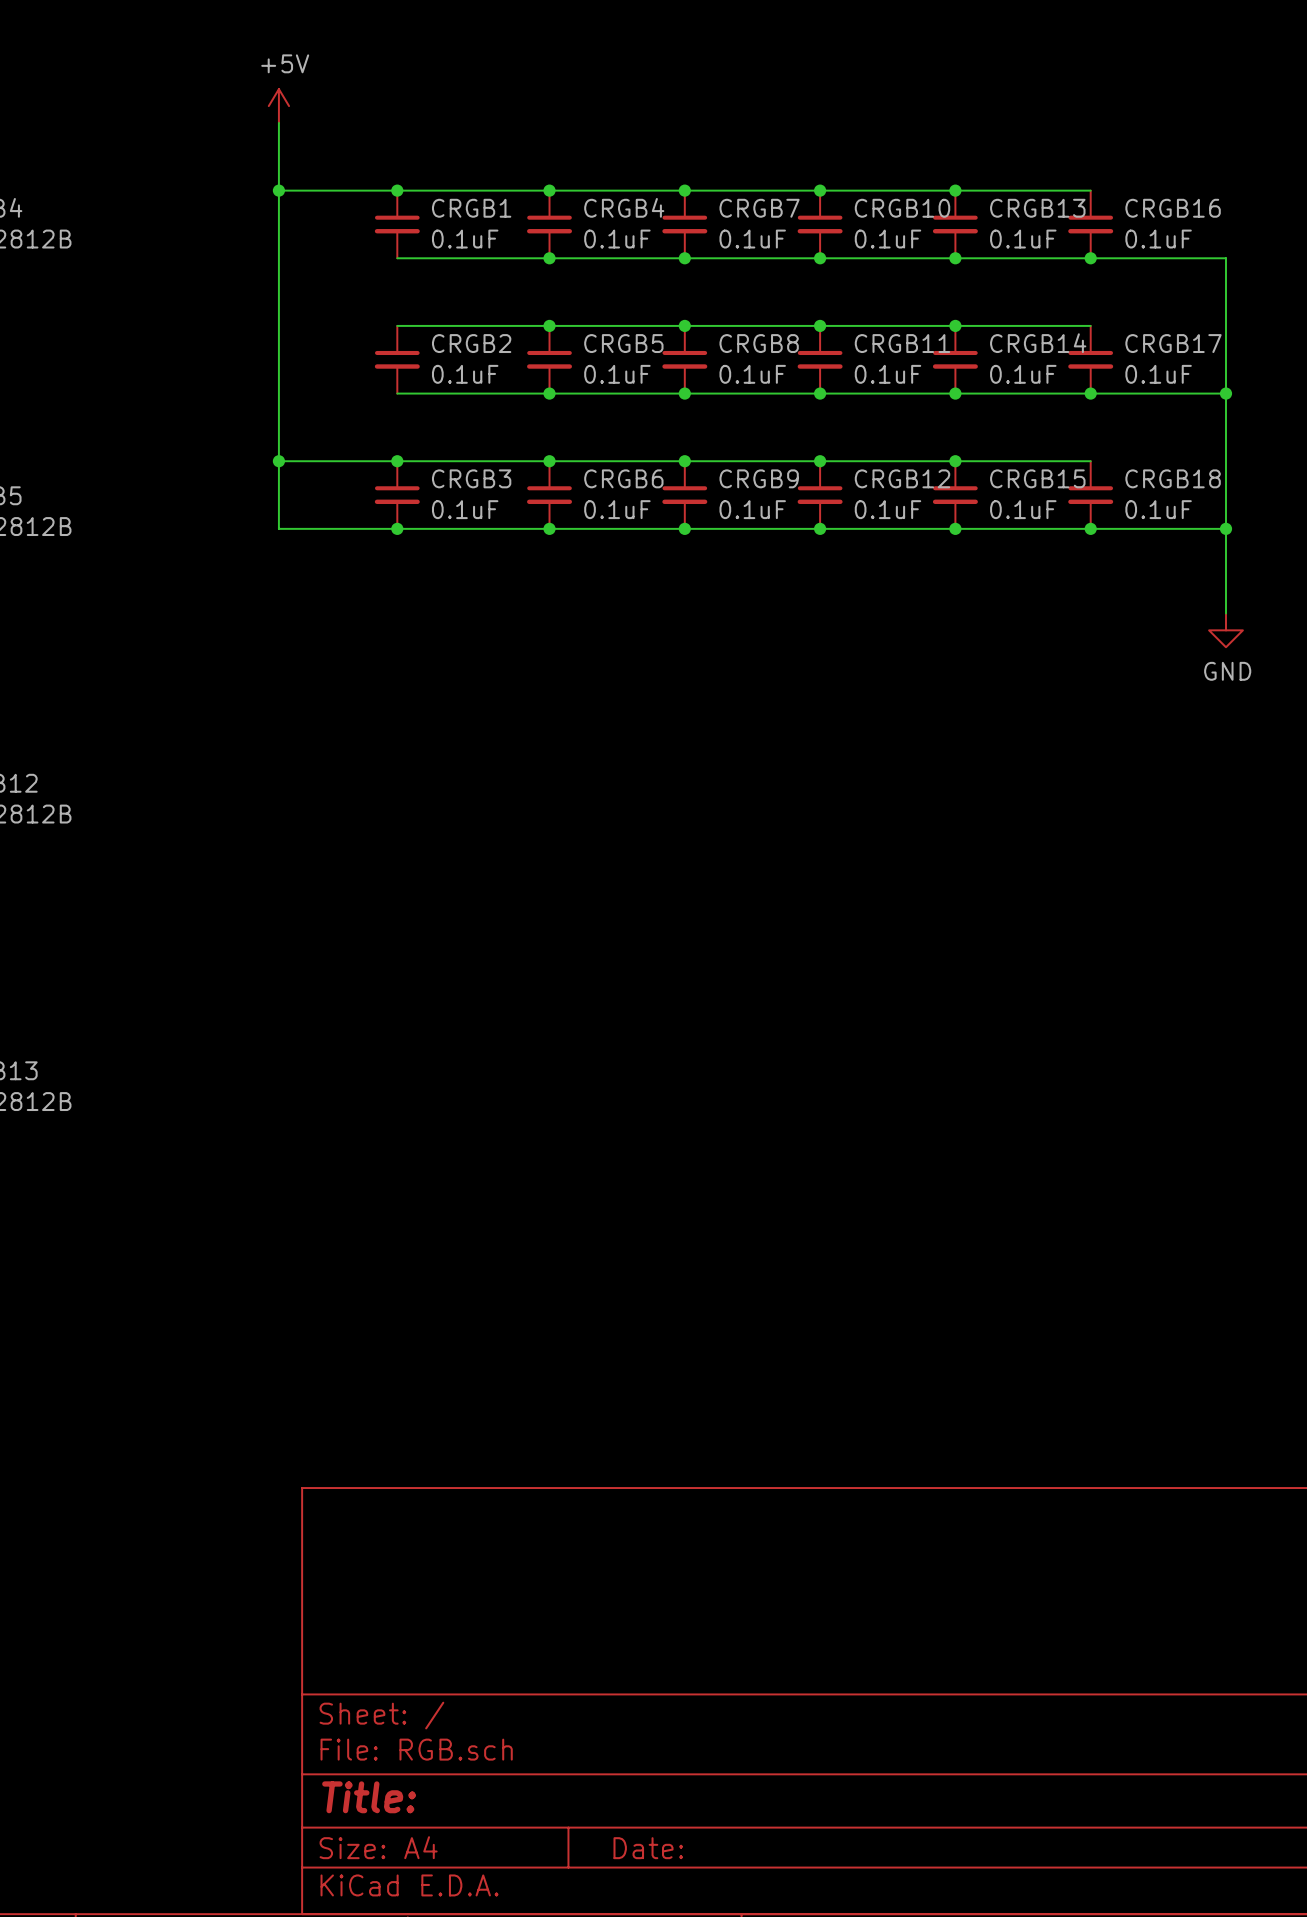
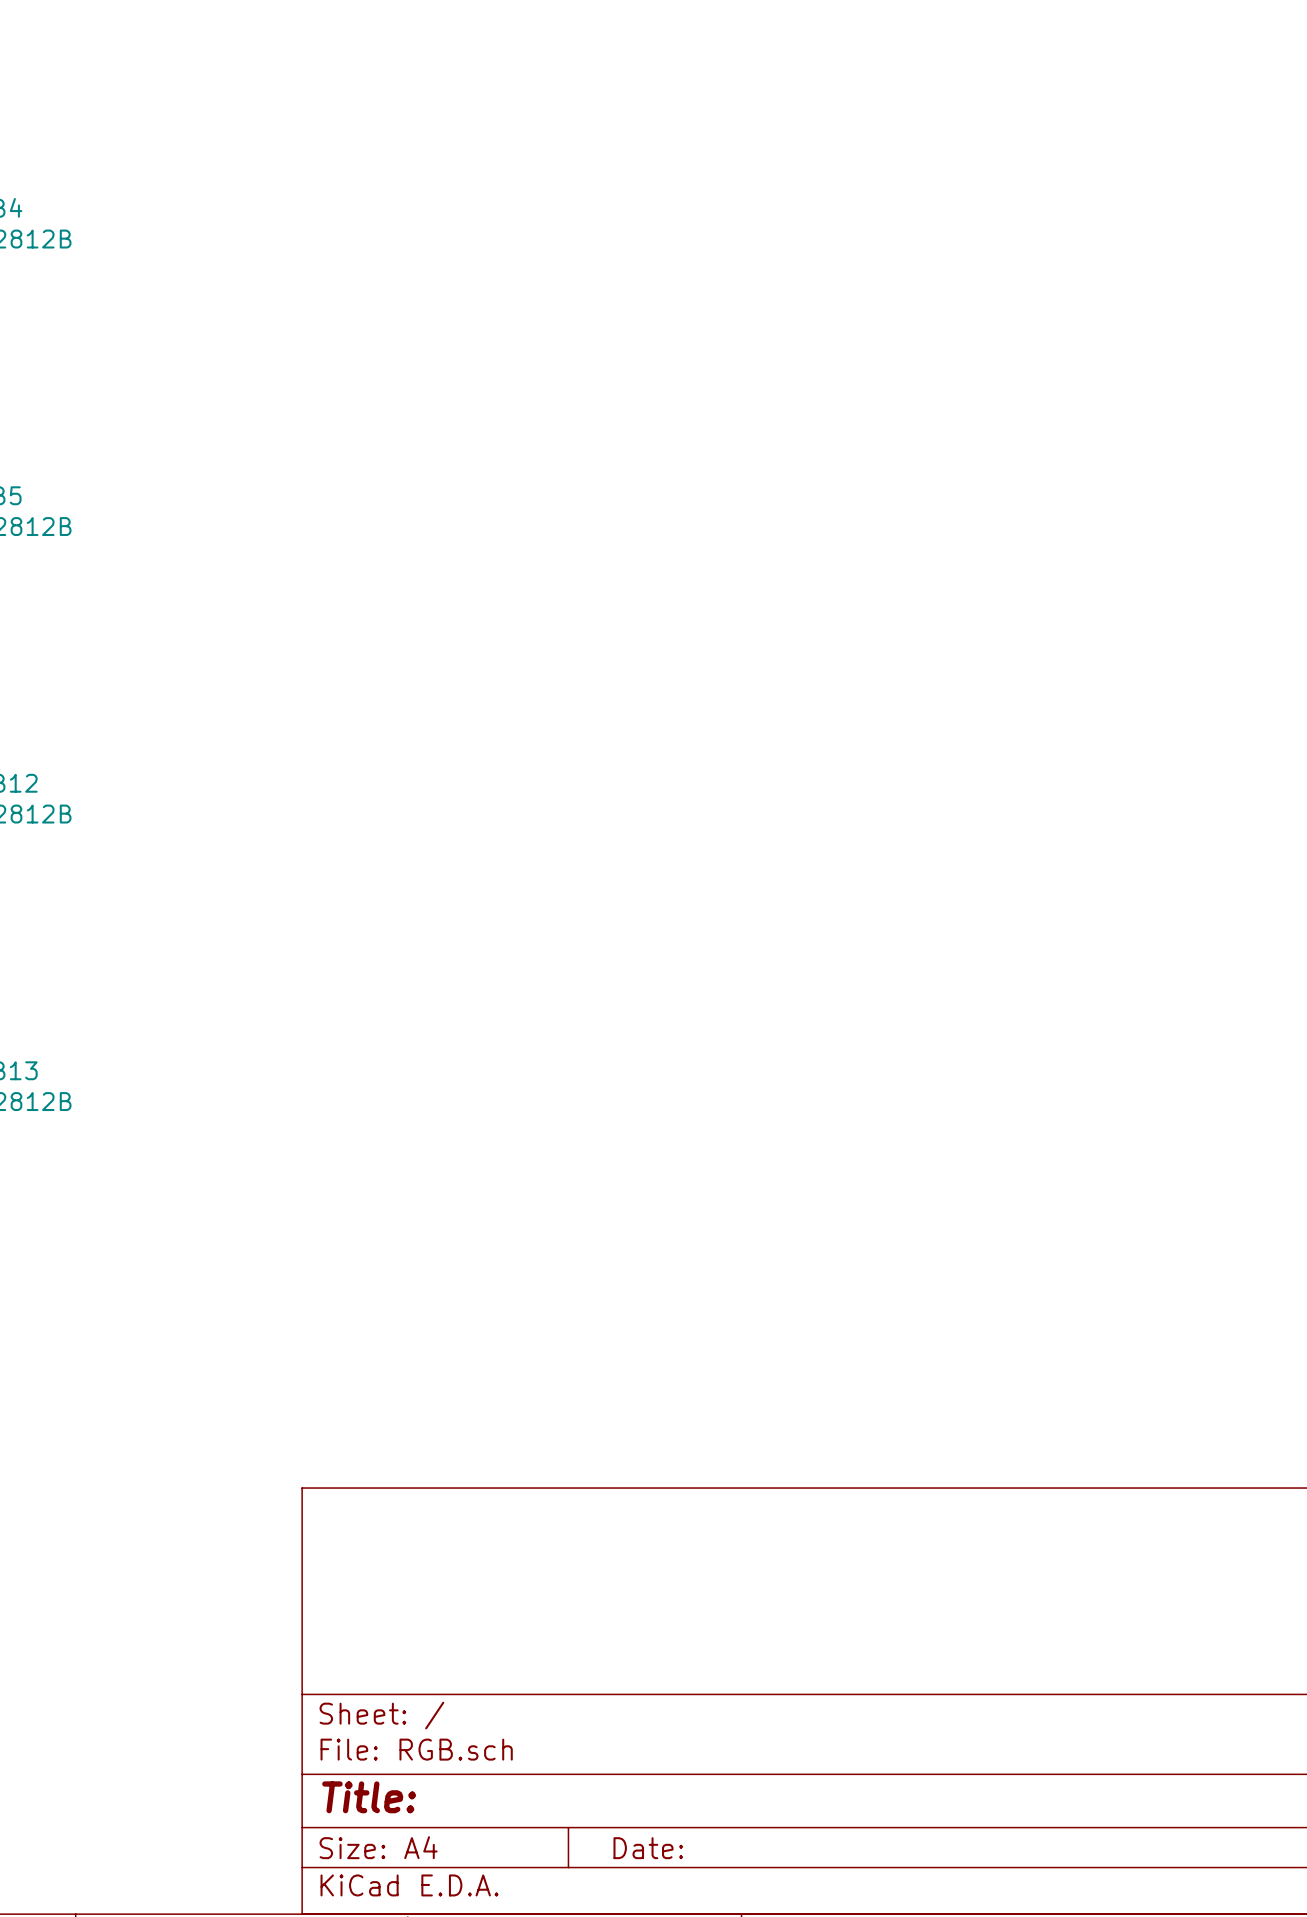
power symbol: +5V (278, 106) -> none
wire: (278, 122) (278, 528) (1226, 528) -> none
wire: (278, 190) (1090, 190) -> none
junction: (278, 190) -> none
junction: (397, 190) -> none
junction: (549, 190) -> none
junction: (684, 190) -> none
junction: (820, 190) -> none
junction: (955, 190) -> none
CRGB1: 0.1uF (397, 224) -> none
CRGB4: 0.1uF (549, 224) -> none
CRGB7: 0.1uF (684, 224) -> none
CRGB10: 0.1uF (820, 224) -> none
CRGB13: 0.1uF (955, 224) -> none
CRGB16: 0.1uF (1090, 224) -> none
wire: (397, 258) (1226, 258) (1226, 613) -> none
junction: (549, 258) -> none
junction: (684, 258) -> none
junction: (820, 258) -> none
junction: (955, 258) -> none
junction: (1090, 258) -> none
wire: (397, 325) (1090, 325) -> none
junction: (549, 325) -> none
junction: (684, 325) -> none
junction: (820, 325) -> none
junction: (955, 325) -> none
CRGB2: 0.1uF (397, 359) -> none
CRGB5: 0.1uF (549, 359) -> none
CRGB8: 0.1uF (684, 359) -> none
CRGB11: 0.1uF (820, 359) -> none
CRGB14: 0.1uF (955, 359) -> none
CRGB17: 0.1uF (1090, 359) -> none
wire: (397, 393) (1226, 393) -> none
junction: (549, 393) -> none
junction: (684, 393) -> none
junction: (820, 393) -> none
junction: (955, 393) -> none
junction: (1090, 393) -> none
junction: (1226, 393) -> none
wire: (278, 461) (1090, 461) -> none
junction: (278, 461) -> none
junction: (397, 461) -> none
junction: (549, 461) -> none
junction: (684, 461) -> none
junction: (820, 461) -> none
junction: (955, 461) -> none
CRGB3: 0.1uF (397, 495) -> none
CRGB6: 0.1uF (549, 495) -> none
CRGB9: 0.1uF (684, 495) -> none
CRGB12: 0.1uF (820, 495) -> none
CRGB15: 0.1uF (955, 495) -> none
CRGB18: 0.1uF (1090, 495) -> none
junction: (397, 528) -> none
junction: (549, 528) -> none
junction: (684, 528) -> none
junction: (820, 528) -> none
junction: (955, 528) -> none
junction: (1090, 528) -> none
junction: (1226, 528) -> none
power symbol: GND (1226, 630) -> none

